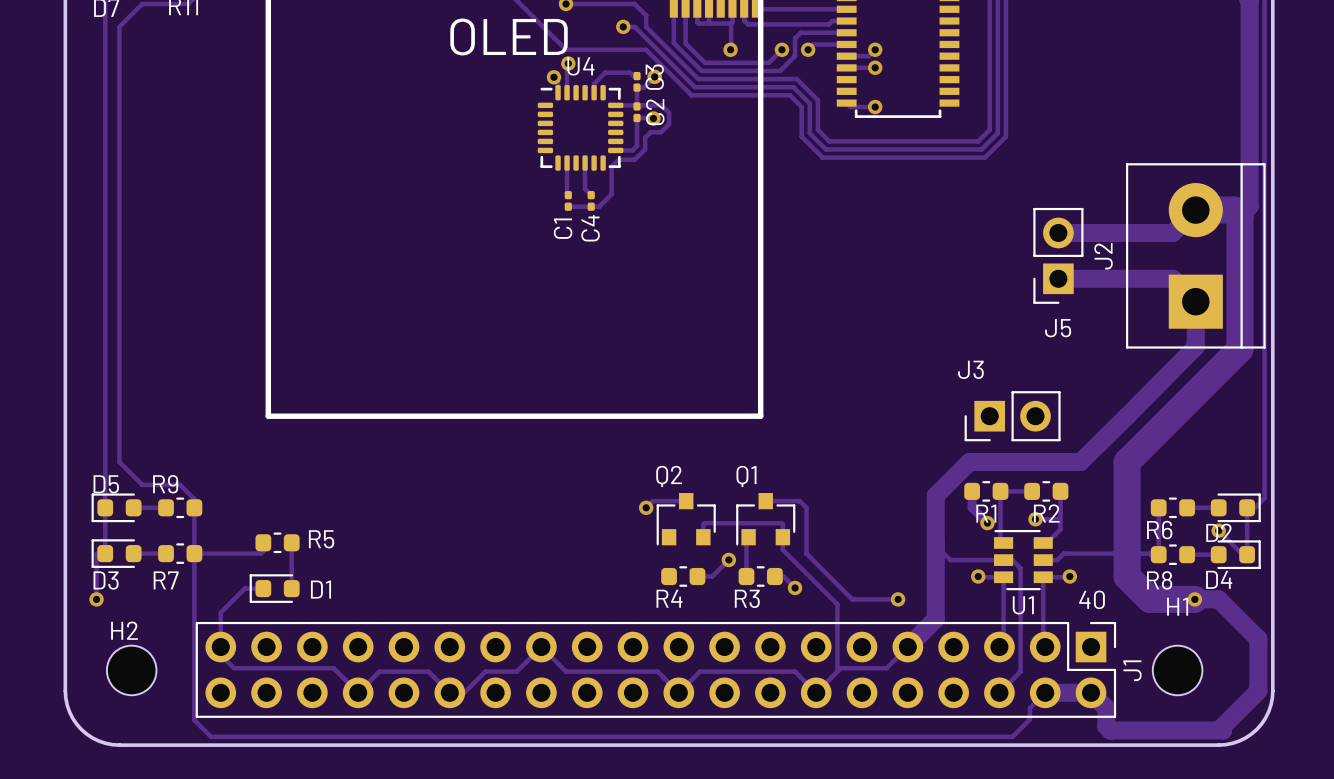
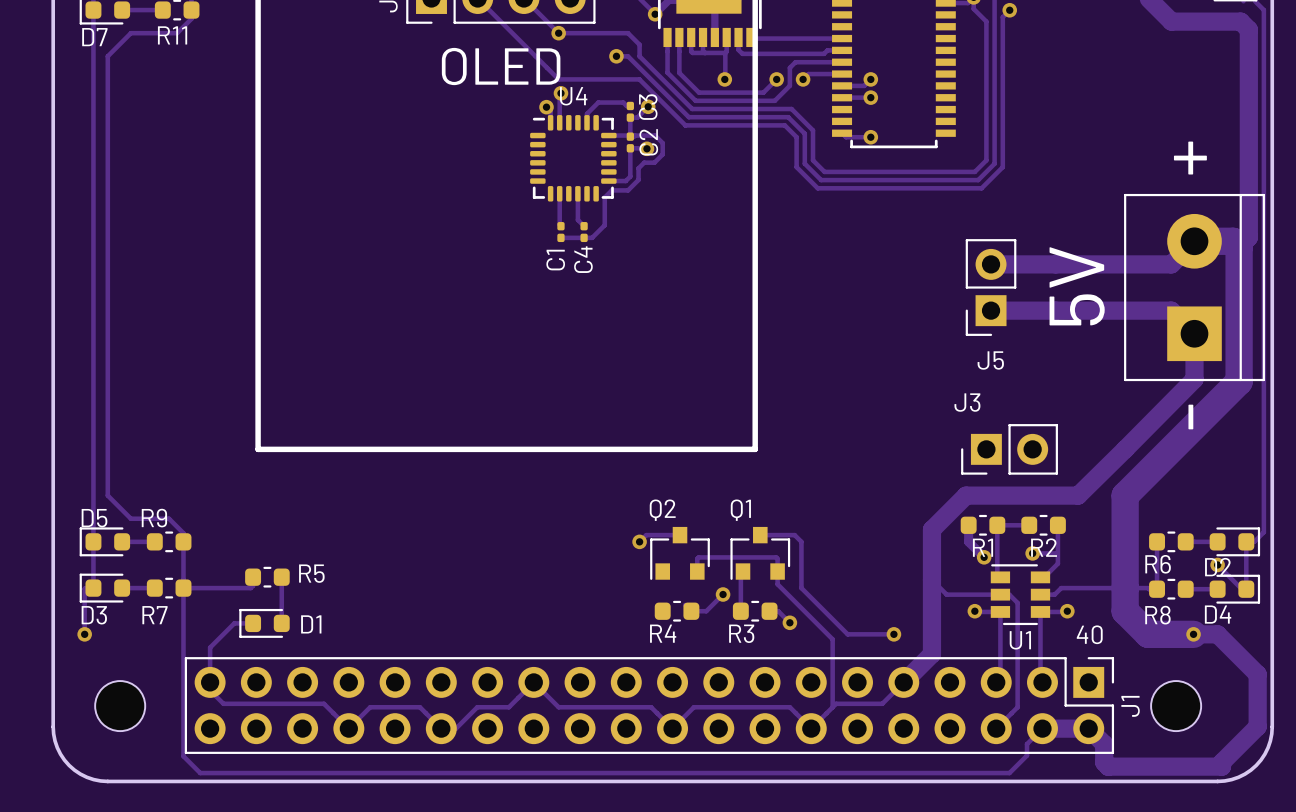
text: none -> + (1190, 158)
track: none -> (991, 264) (1055, 264)
text: none -> 5V (1077, 286)
J5 position: (1058, 255) -> (991, 287)
J2 name: J2 (1103, 256) -> none
track: none -> (991, 310) (1055, 310)
text: none -> - (1190, 417)
H1 name: H1 (1177, 606) -> none
H2 name: H2 (124, 630) -> none

